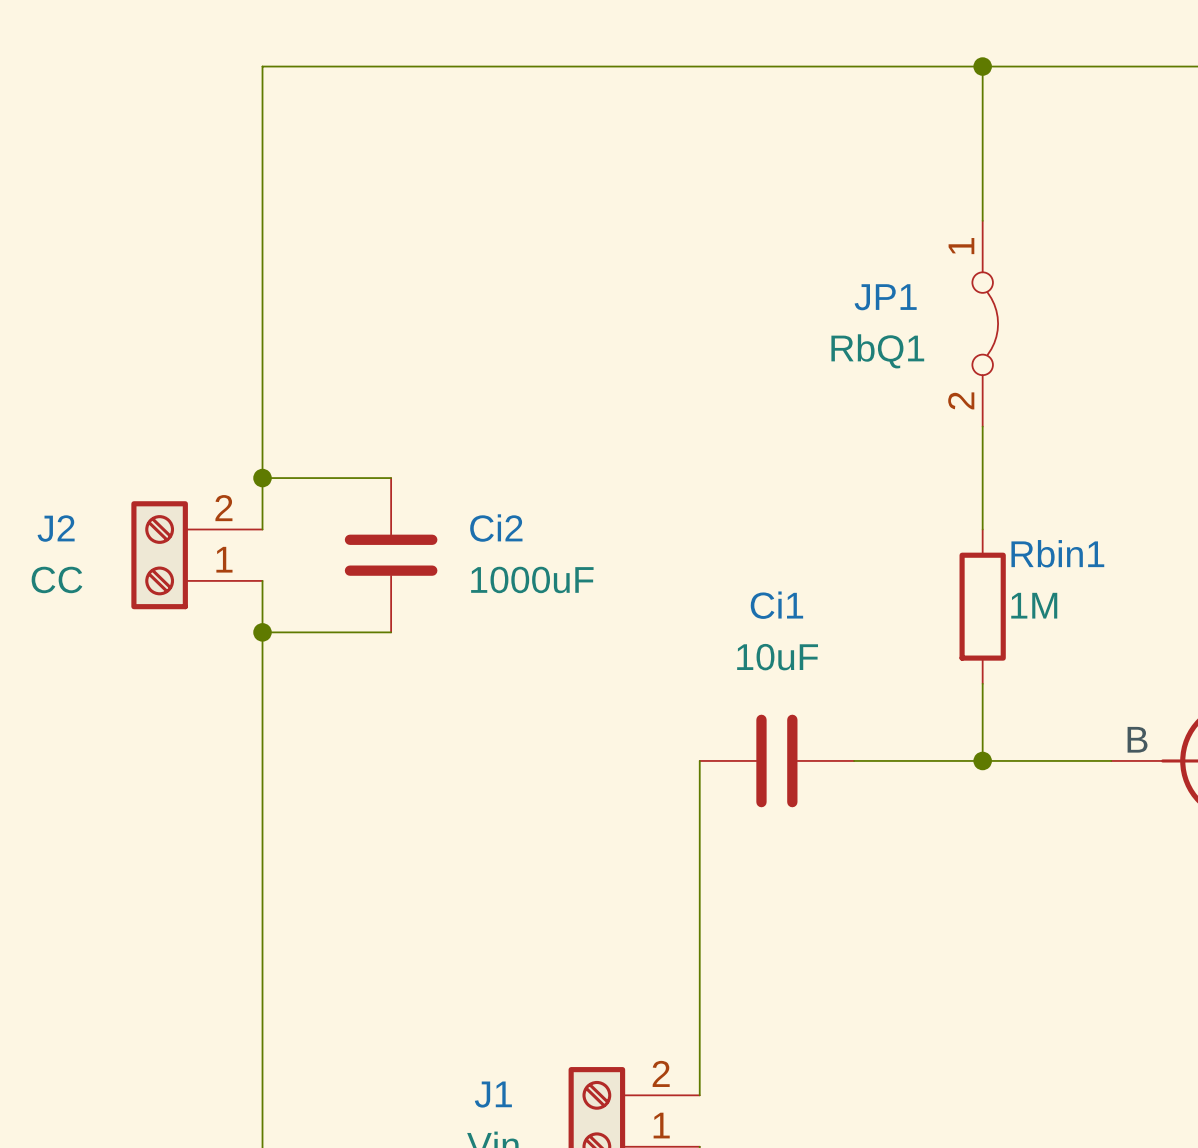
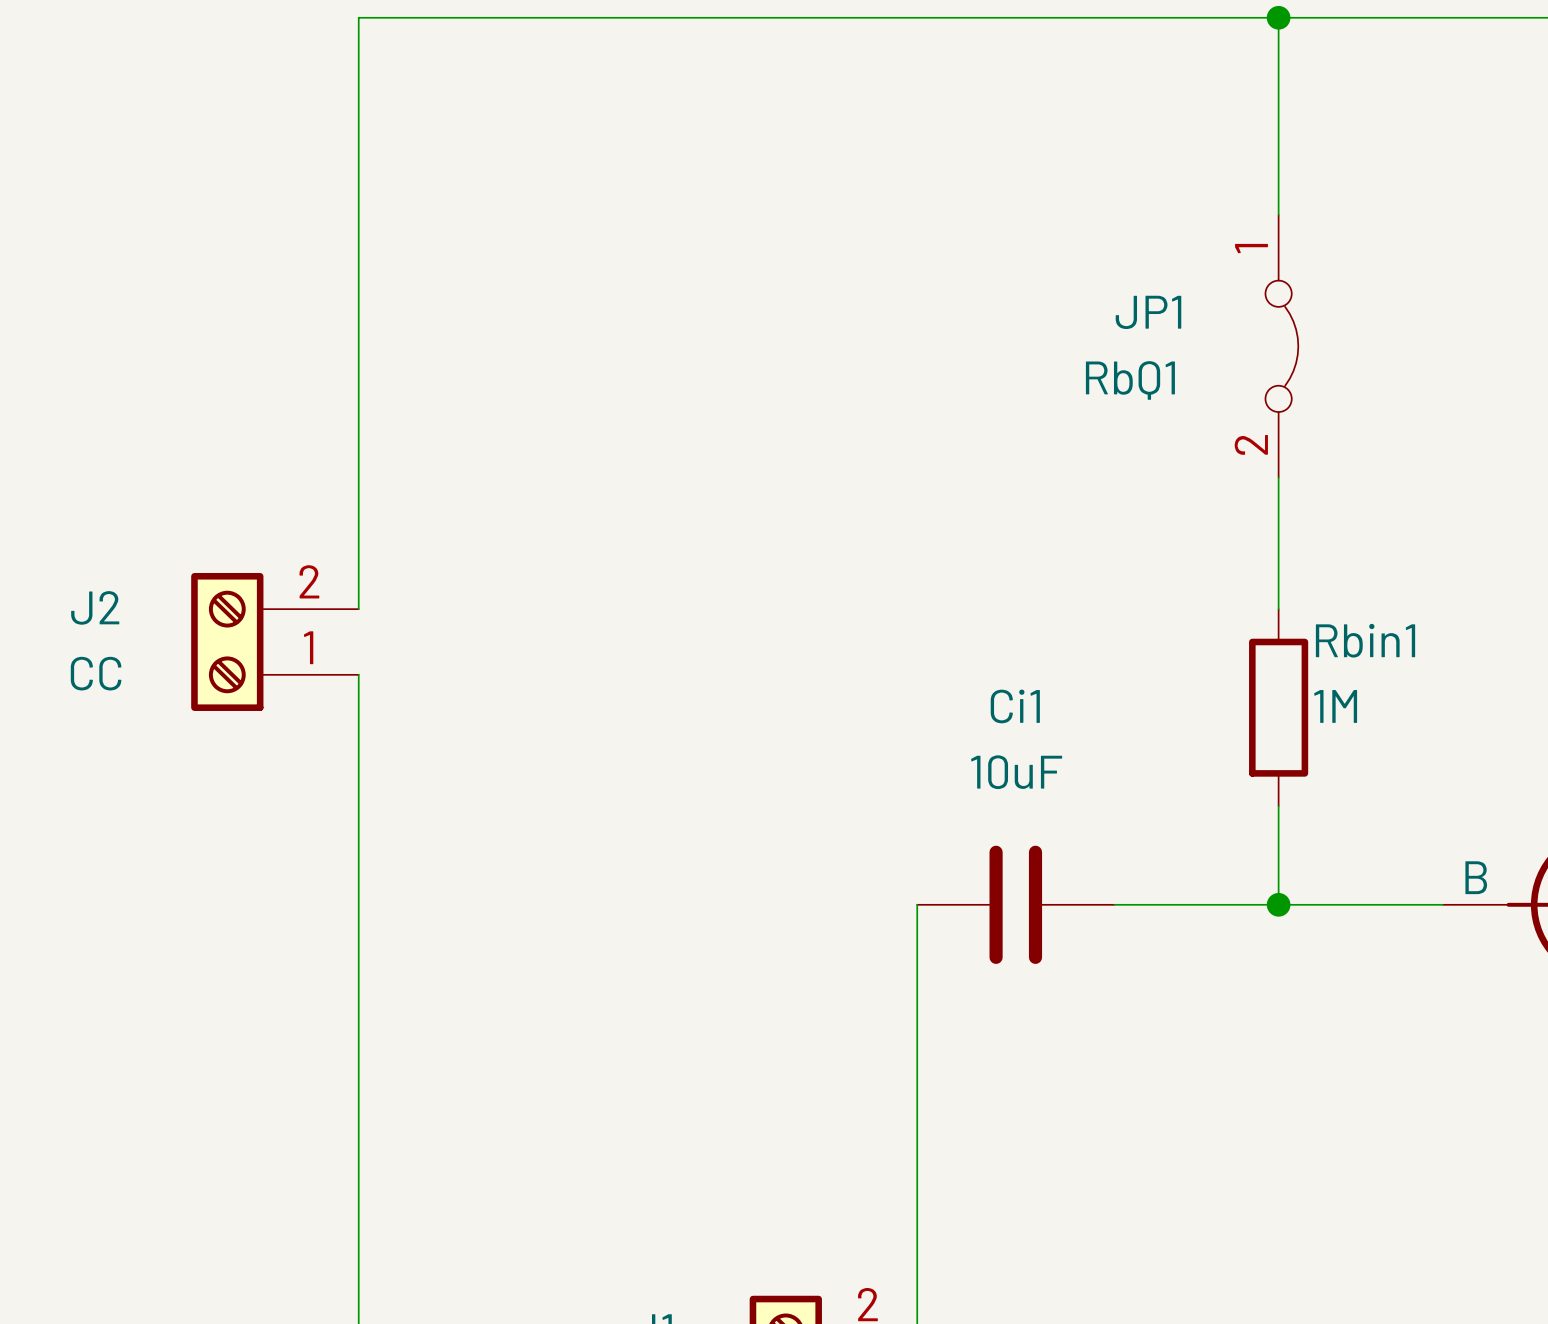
wire: (262, 478) (391, 478) -> none
junction: (262, 478) -> none
Ci2: 1000uF (391, 555) -> none
wire: (262, 632) (391, 632) -> none
junction: (262, 632) -> none

